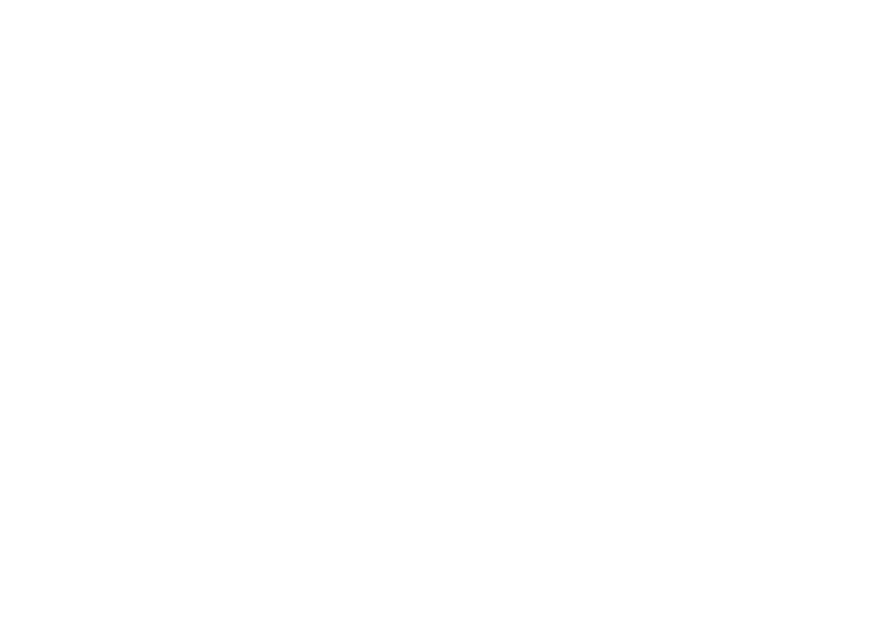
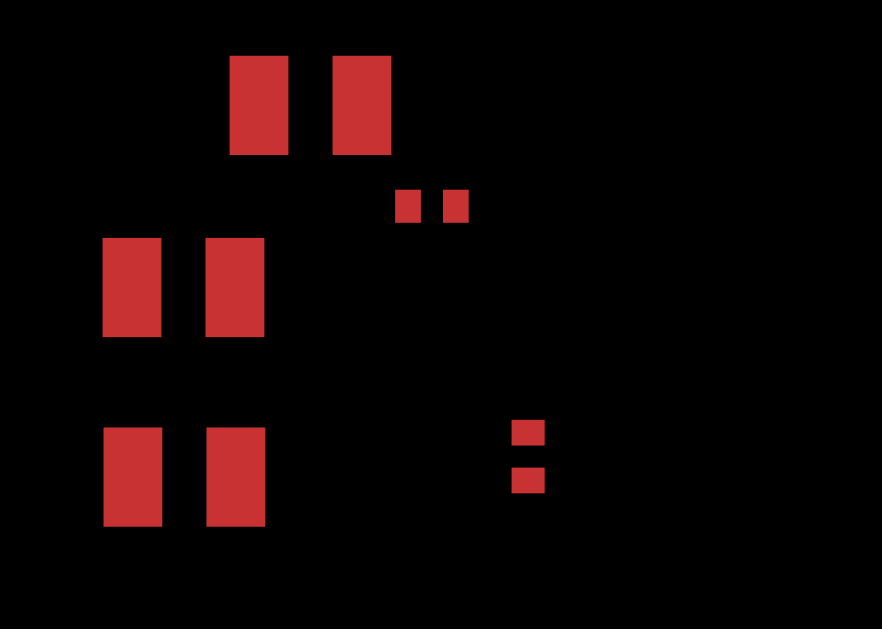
part: none -> (310, 105)
part: none -> (431, 206)
part: none -> (183, 287)
part: none -> (528, 456)
part: none -> (184, 477)

